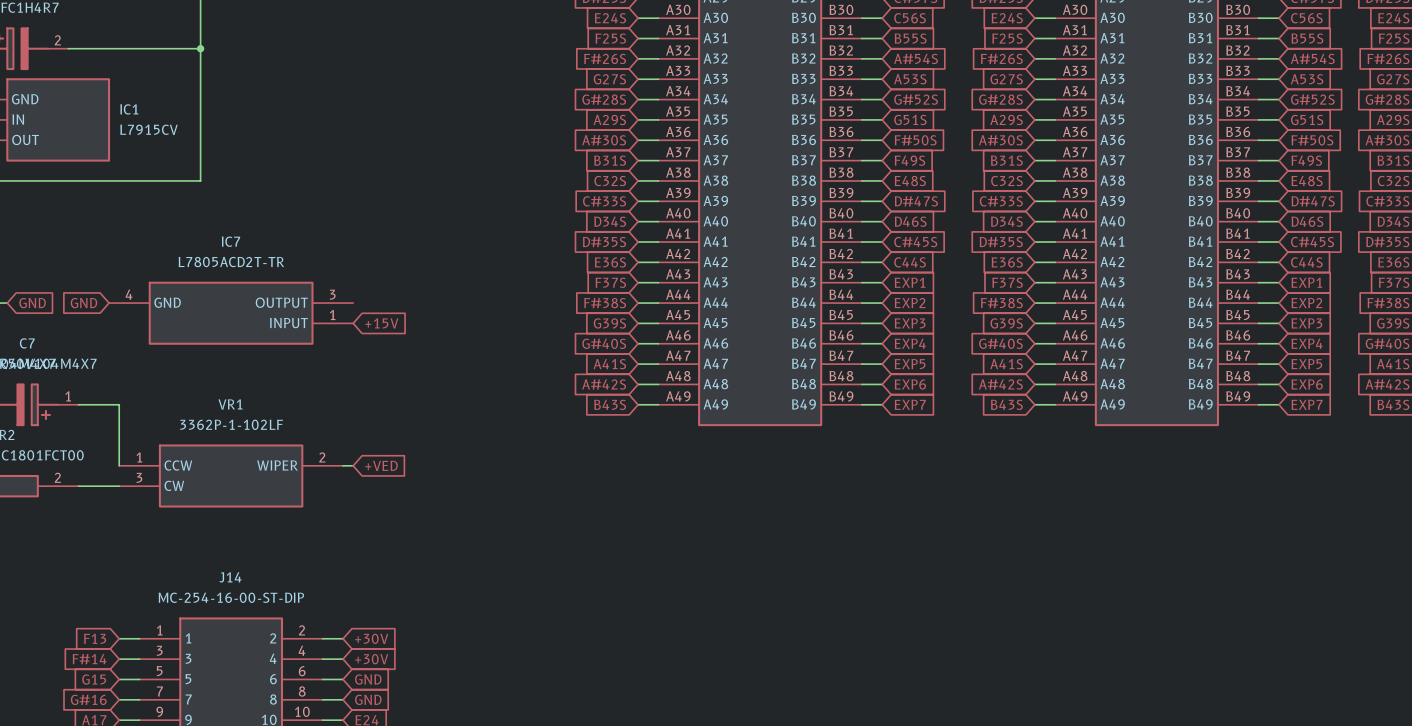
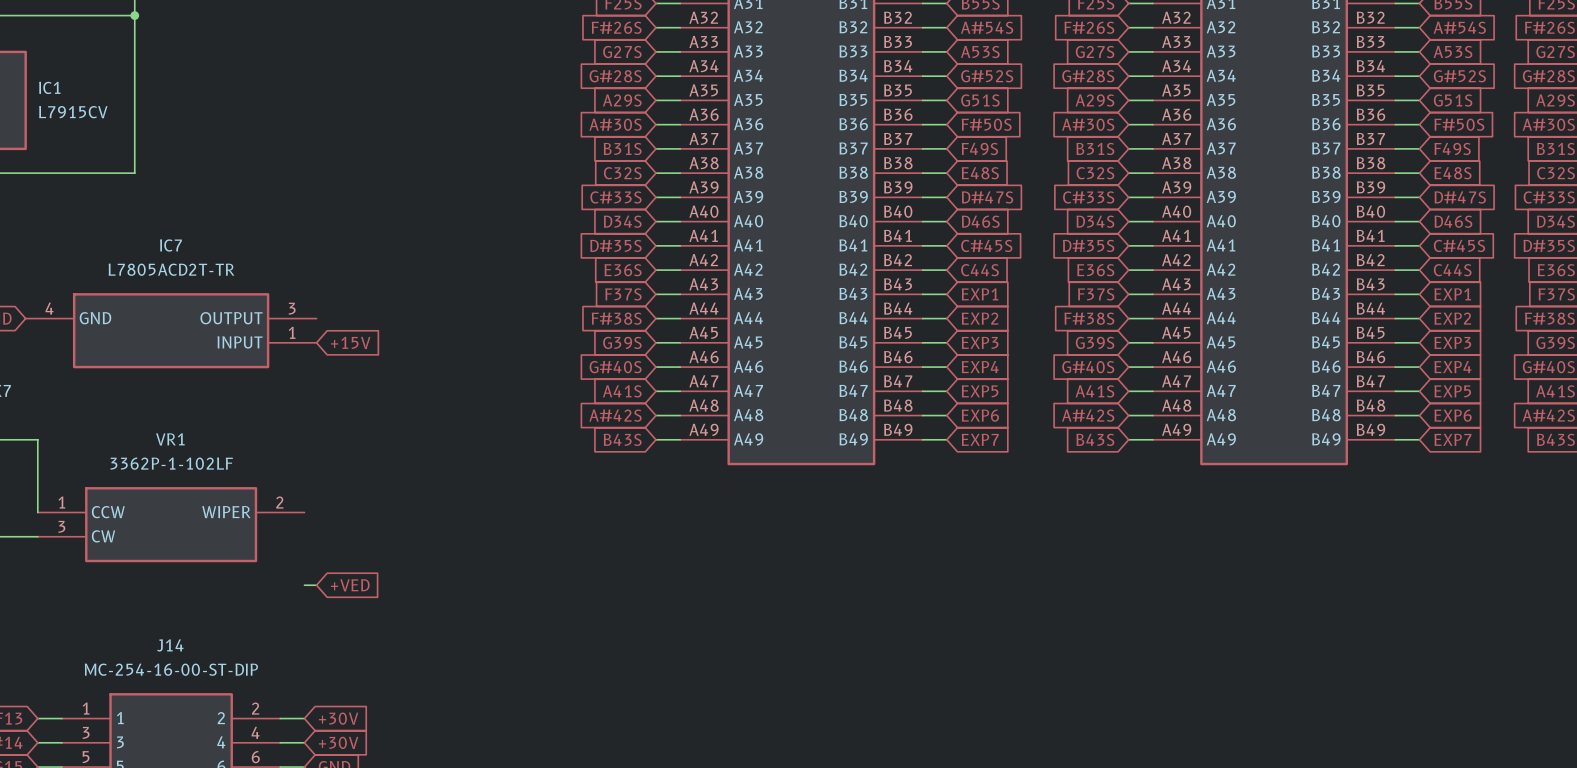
wire: (343, 465) (353, 465) -> (304, 585) (316, 585)
global label position: +VED (381, 465) -> +VED (350, 585)

